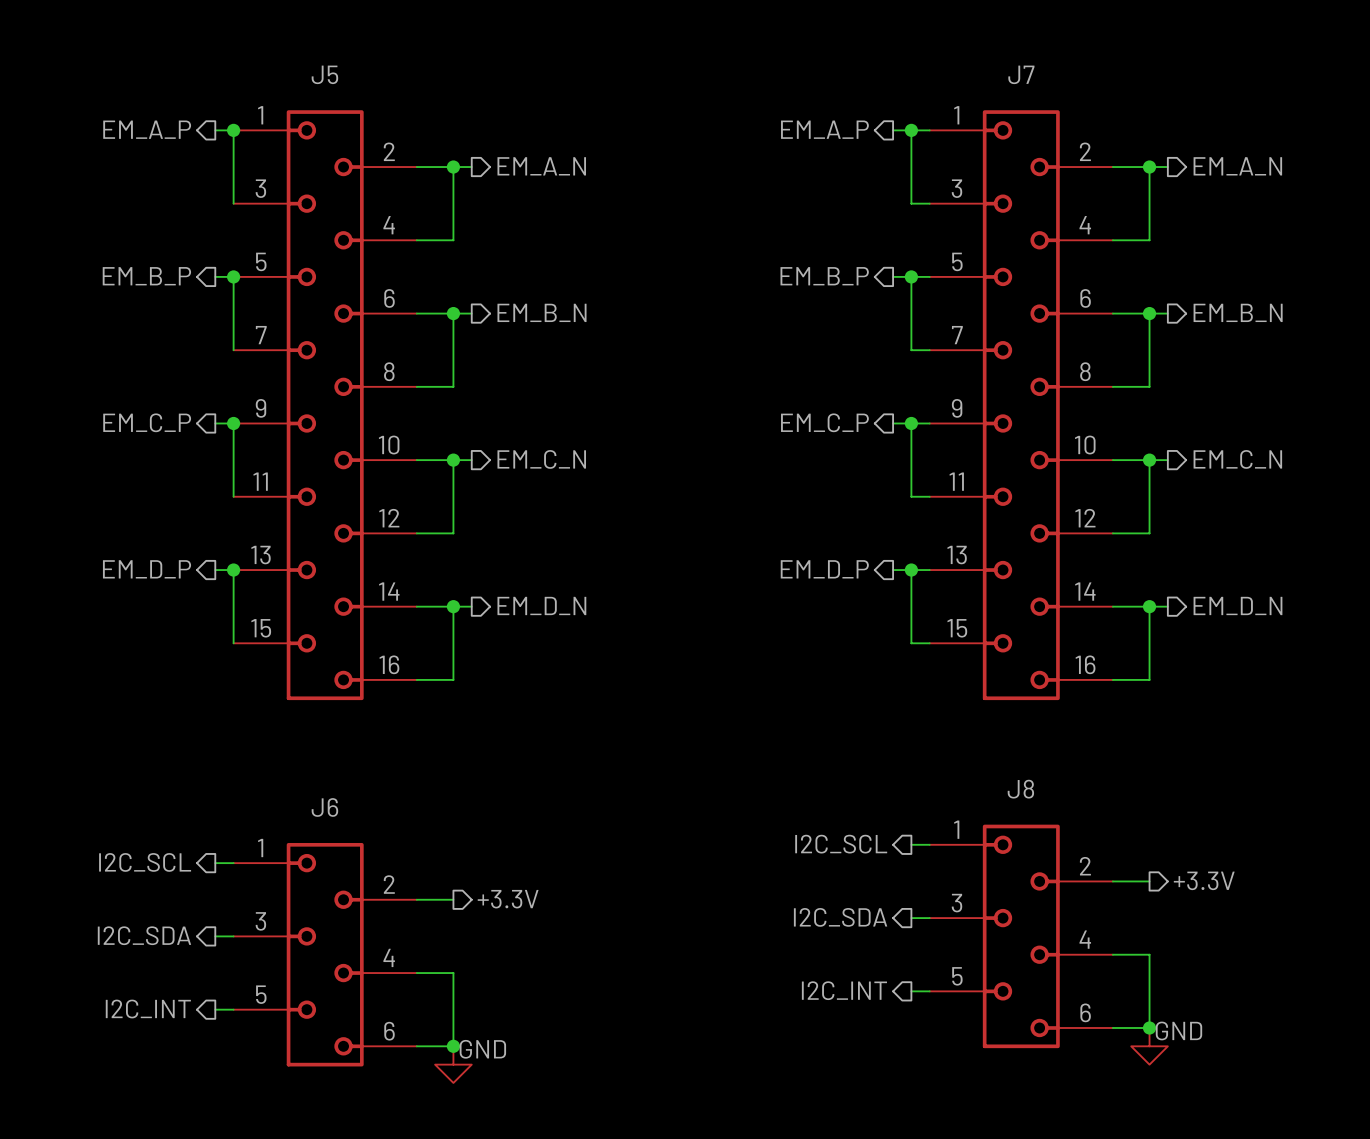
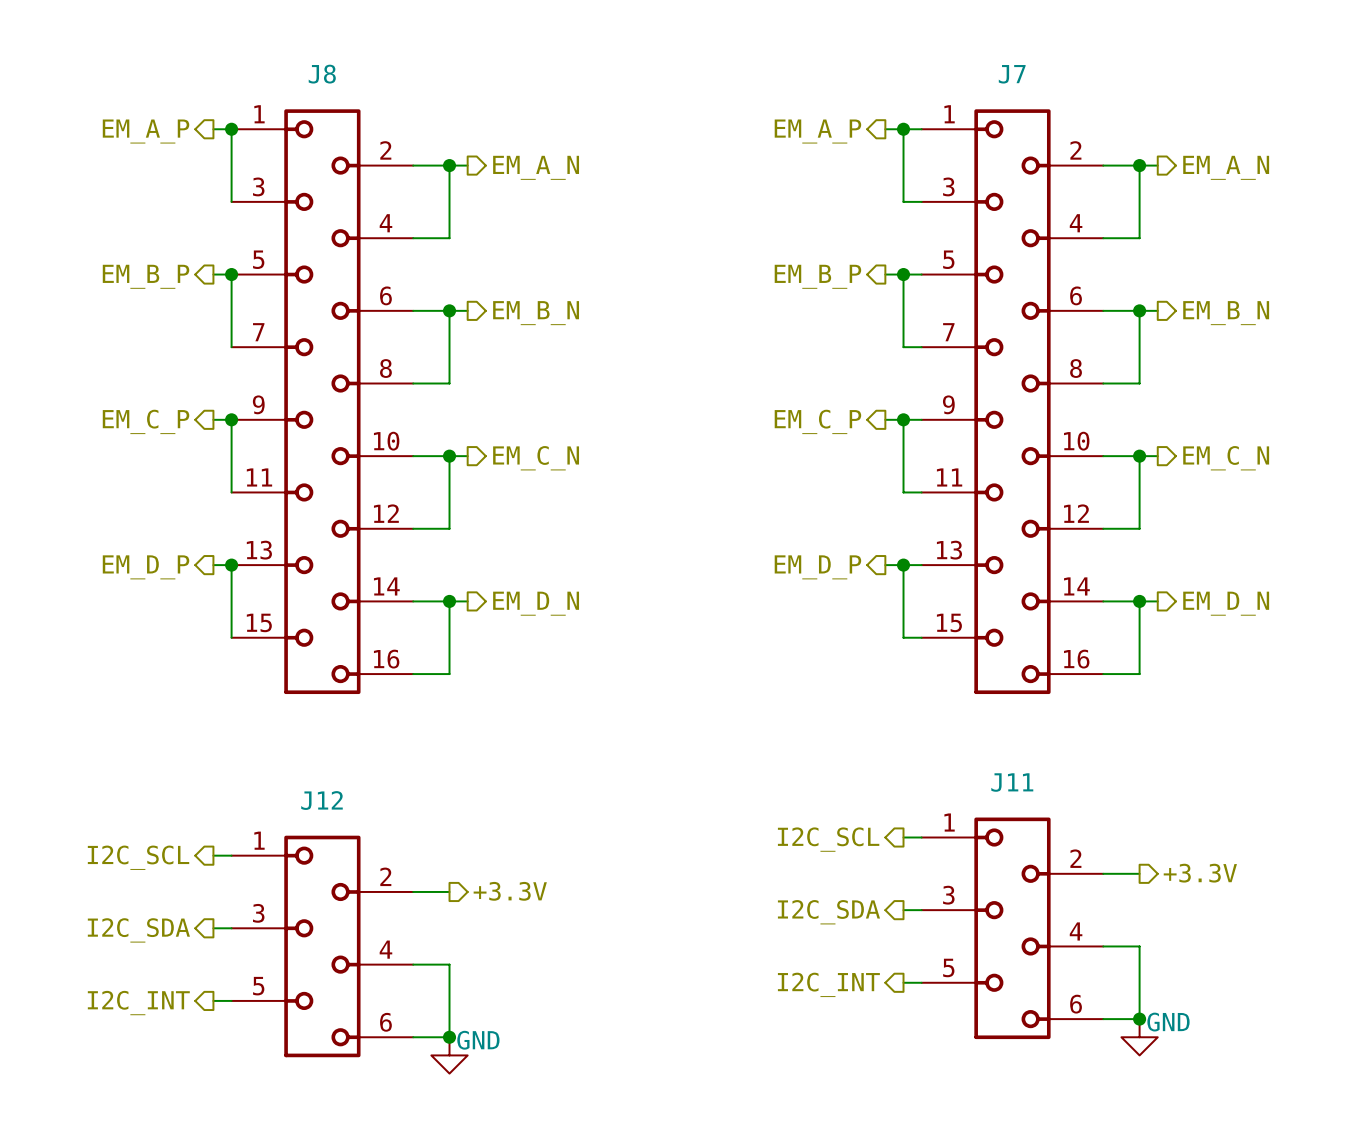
J5 name: J5 (324, 74) -> J8 (322, 74)
J8 name: J8 (1020, 789) -> J11 (1012, 782)
J6 name: J6 (324, 807) -> J12 (321, 800)

